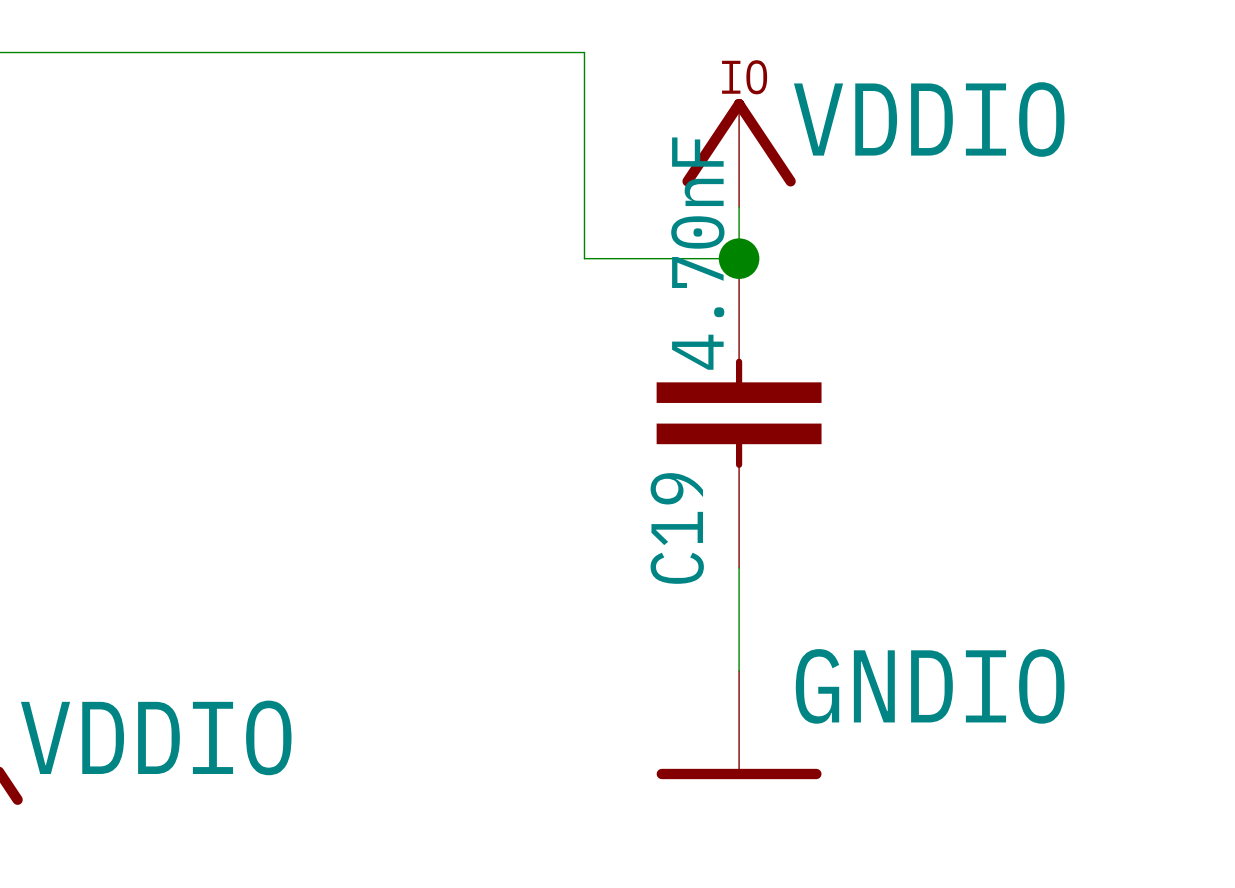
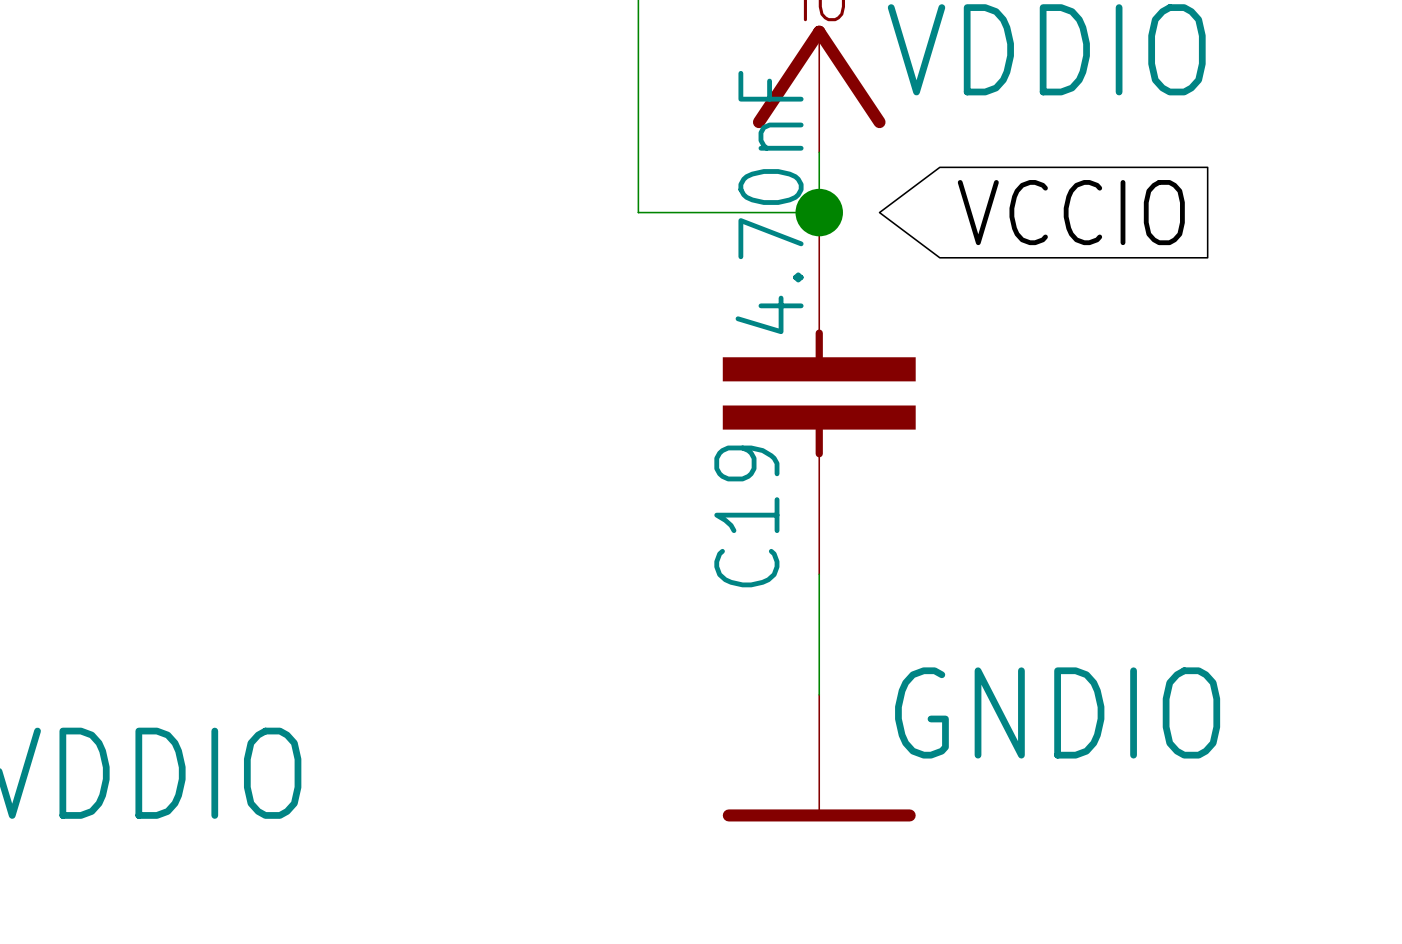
global label: none -> VCCIO (1071, 212)

